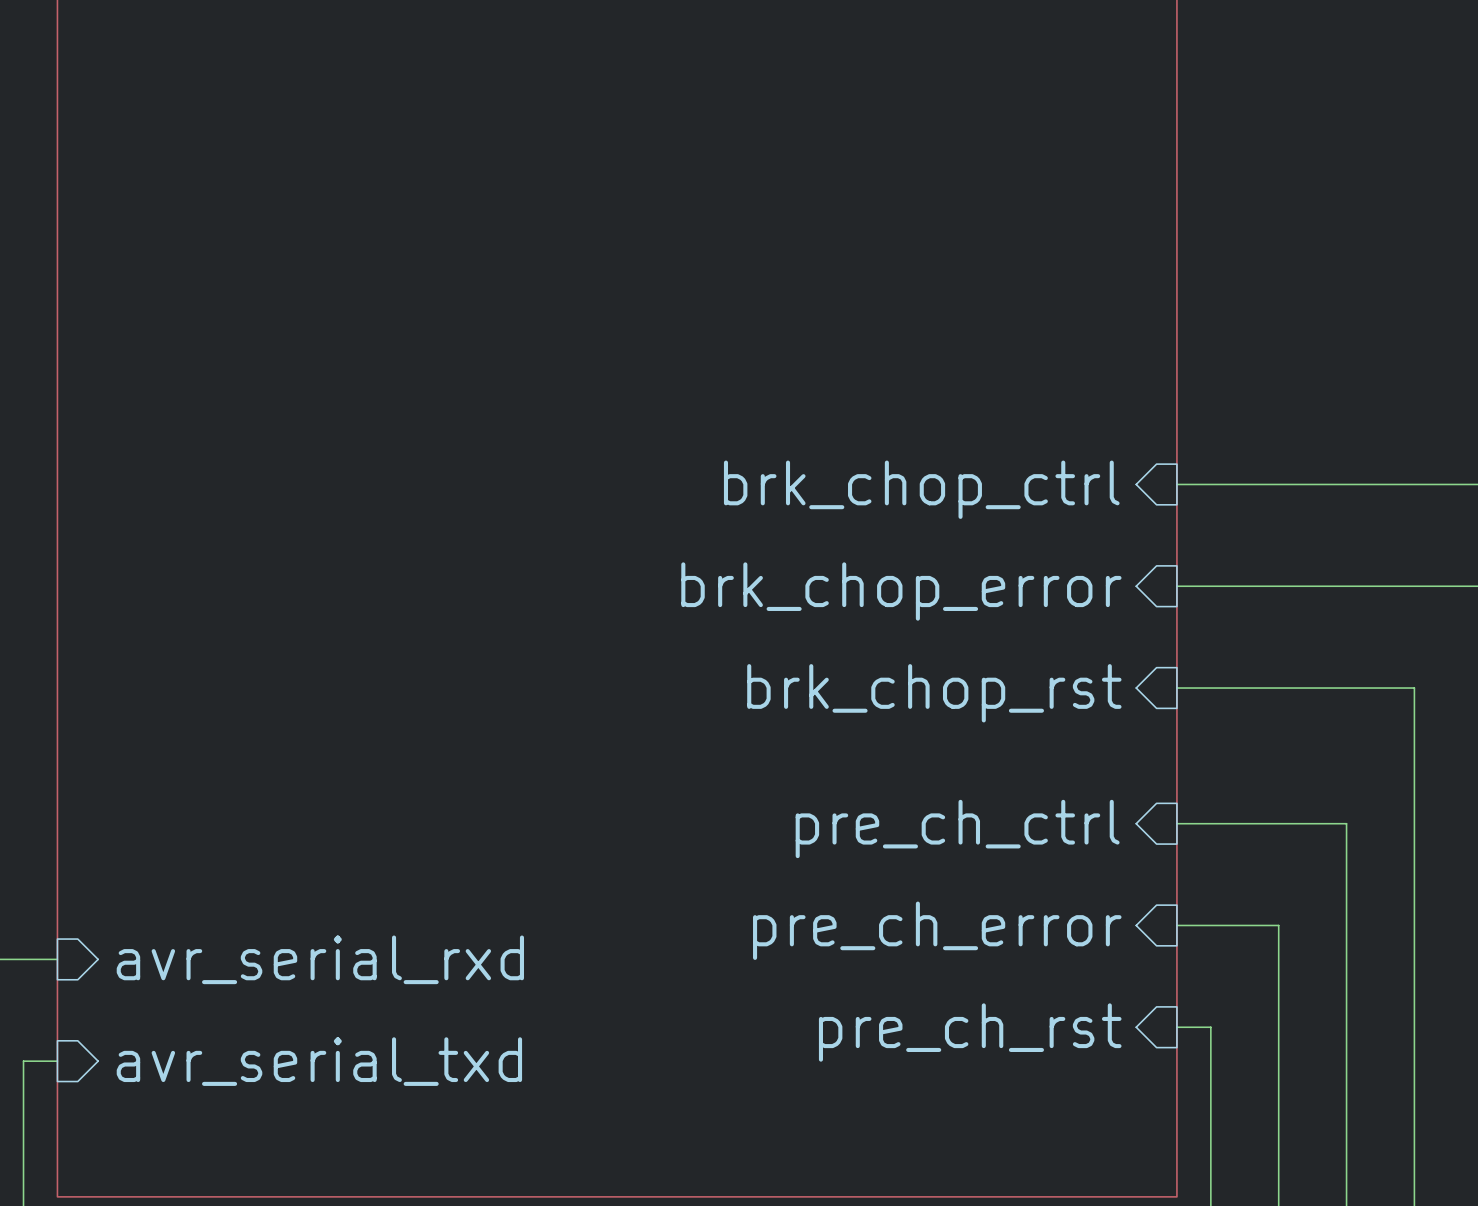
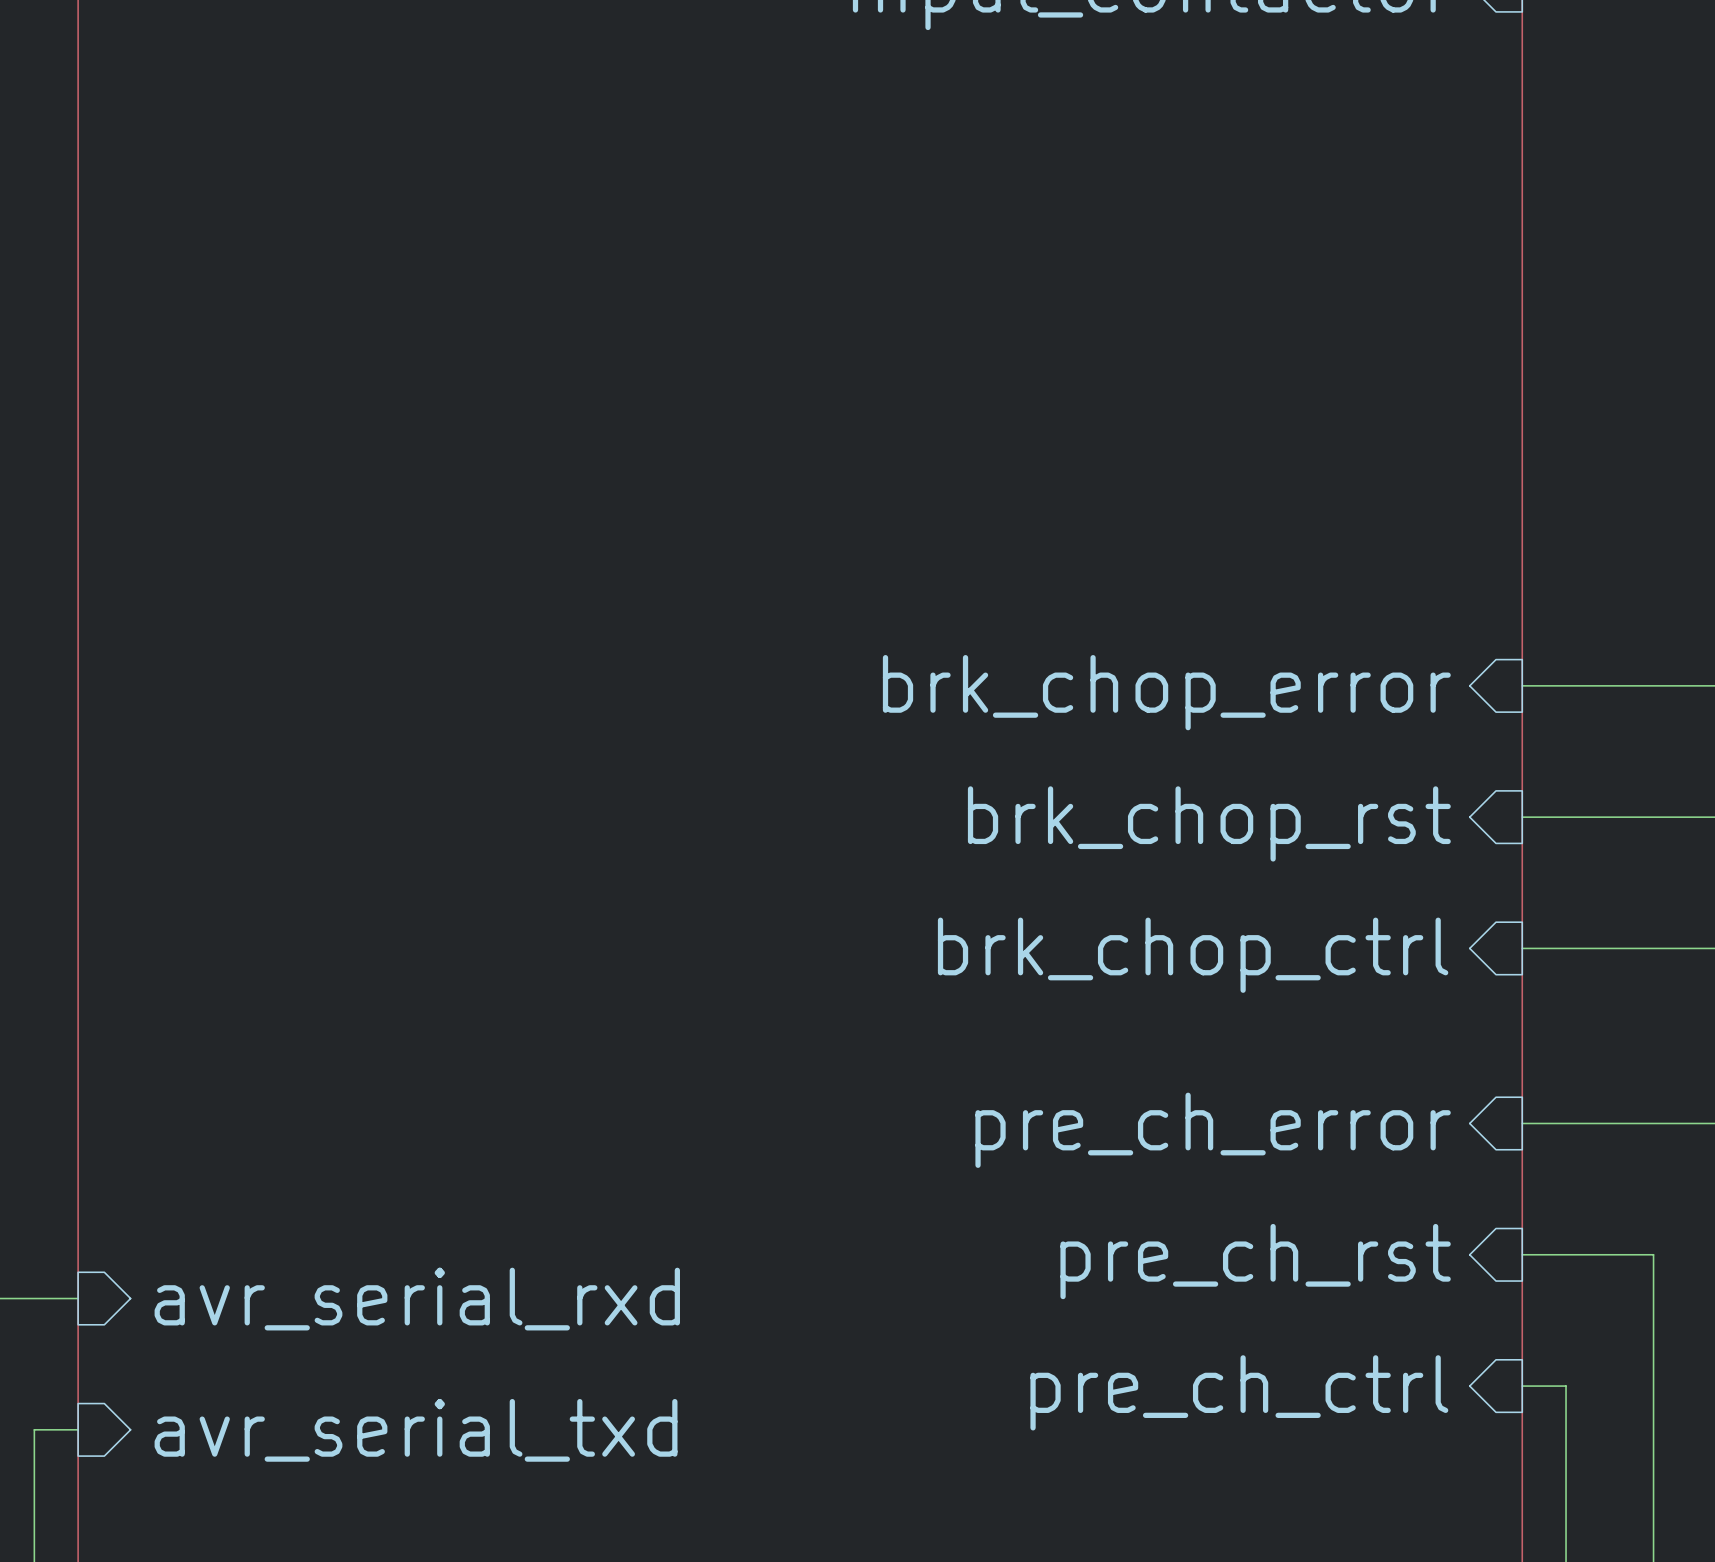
sheet pin: brk_chop_ctrl (921, 489) -> brk_chop_error (1166, 692)
sheet pin: brk_chop_error (901, 591) -> brk_chop_rst (1209, 823)
sheet pin: brk_chop_rst (934, 693) -> brk_chop_ctrl (1193, 955)
sheet pin: pre_ch_ctrl (957, 828) -> pre_ch_error (1213, 1130)
sheet pin: pre_ch_error (937, 930) -> pre_ch_rst (1255, 1261)
sheet pin: pre_ch_rst (970, 1032) -> pre_ch_ctrl (1239, 1392)

